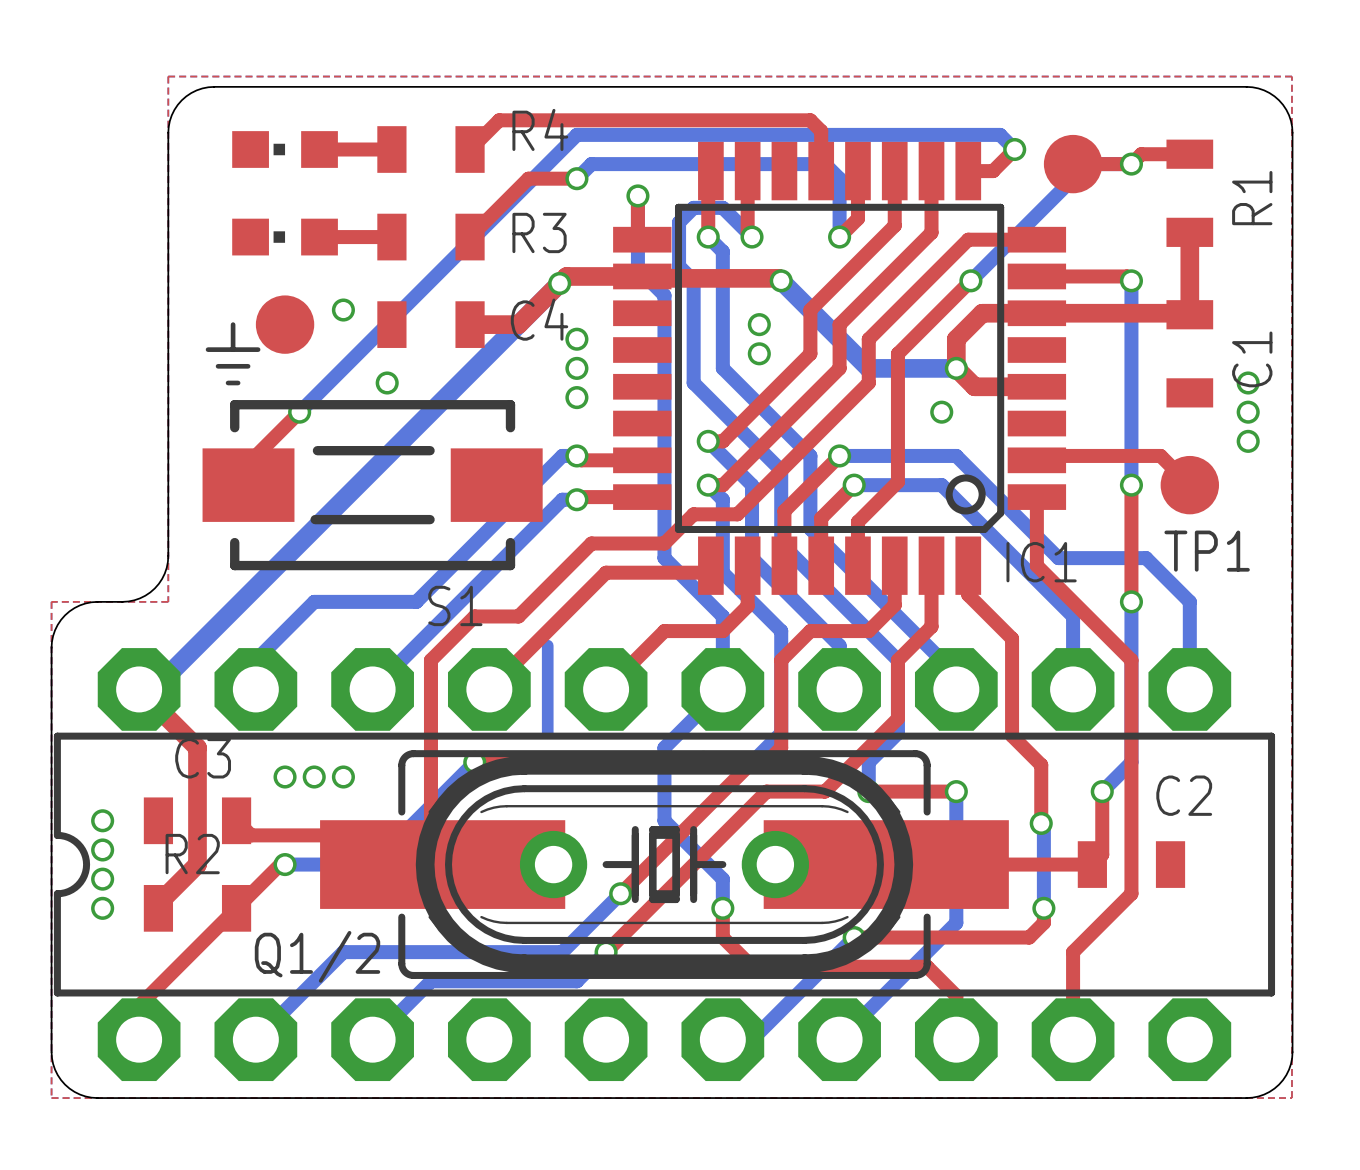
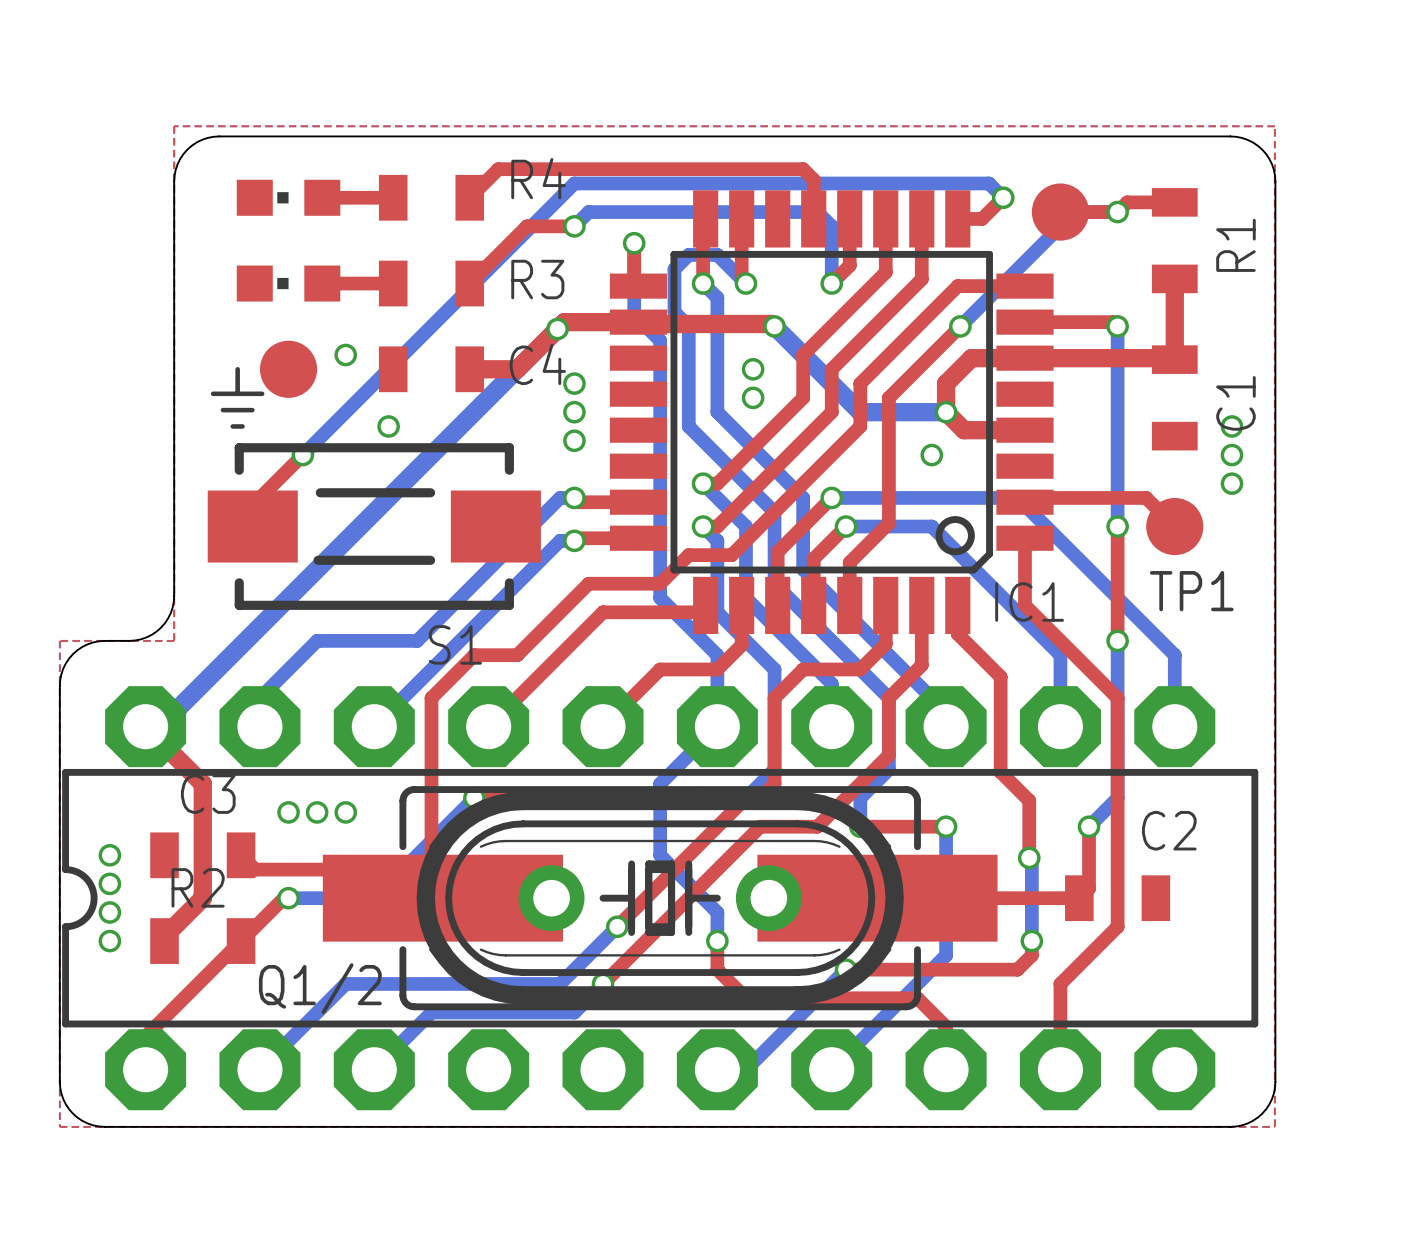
bottom track: (956, 455) (1058, 558) (1146, 558) (1189, 601) (1189, 616) -> (946, 497) (1017, 497) (1174, 655)
bottom track: (547, 645) (547, 733) -> none

